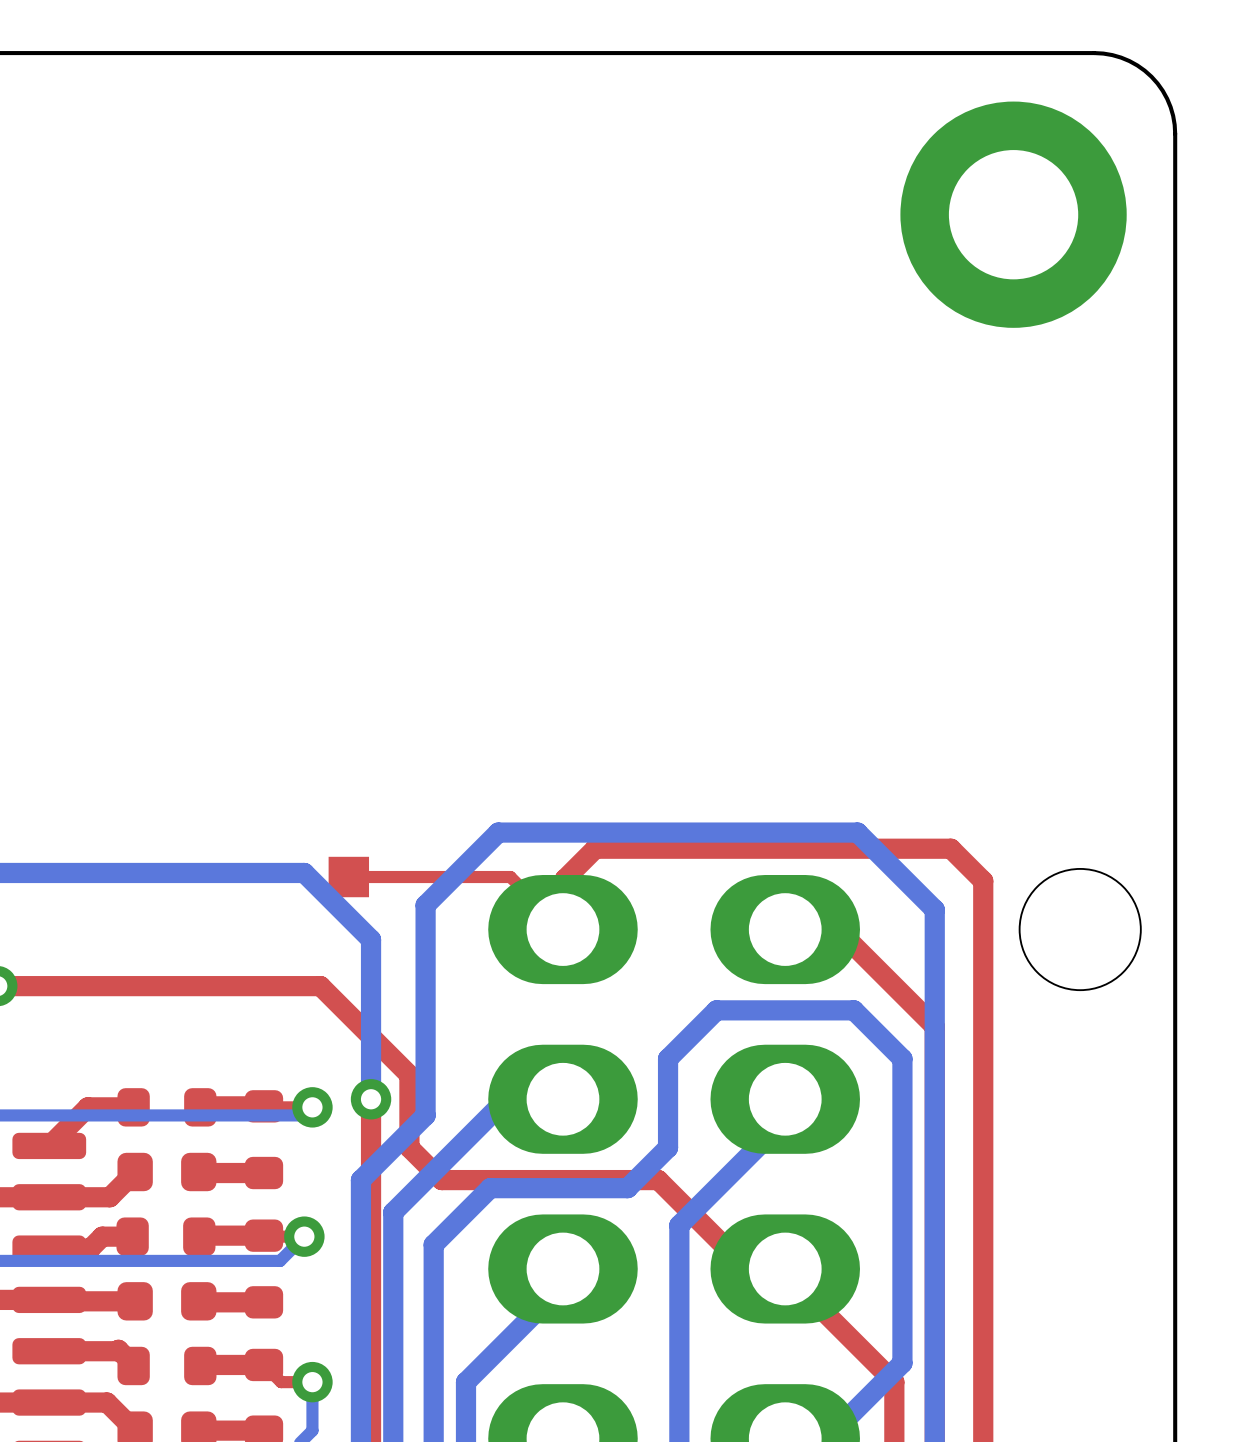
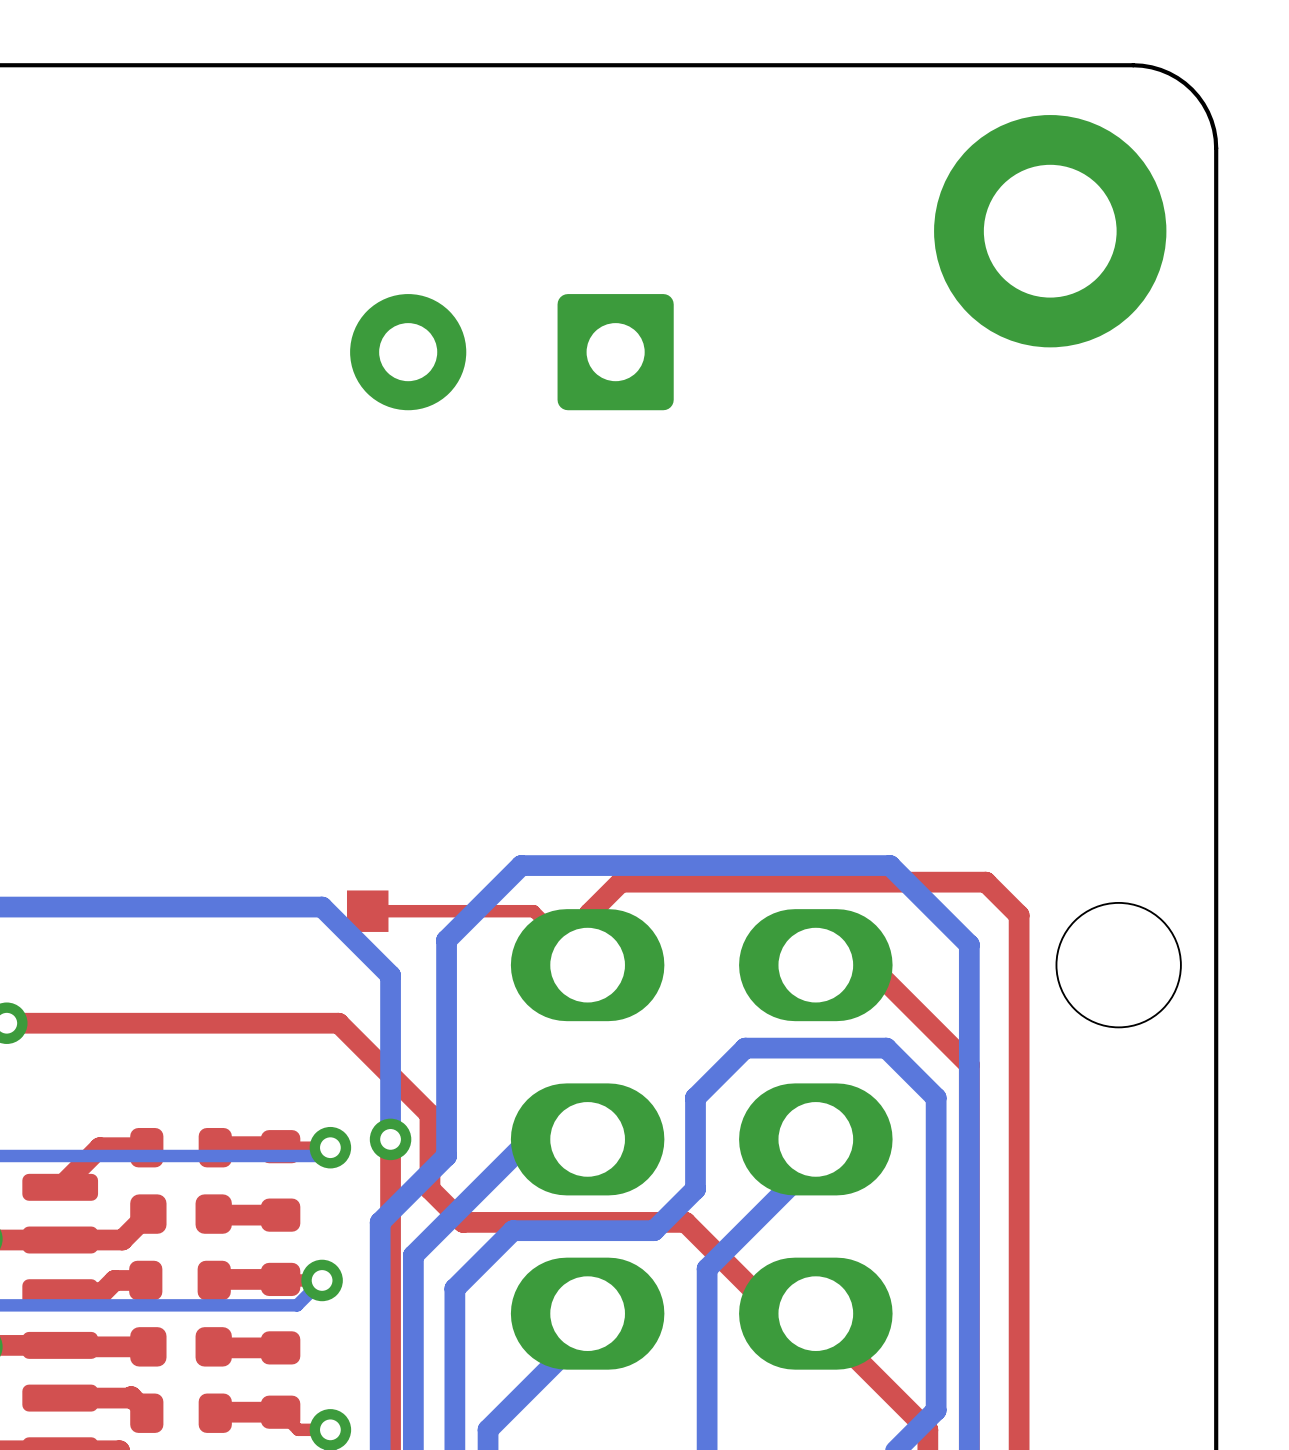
part: none -> (511, 352)

